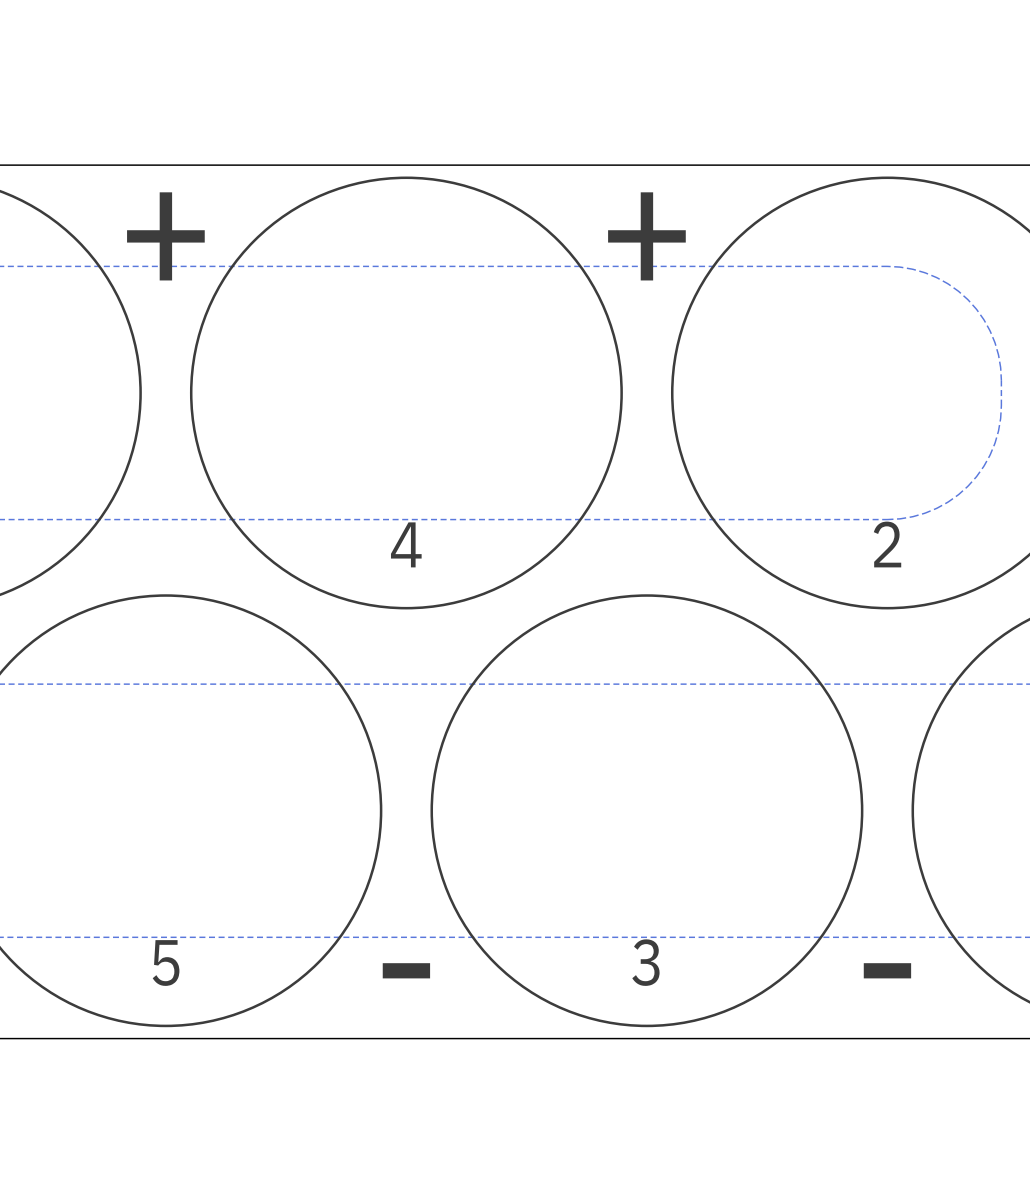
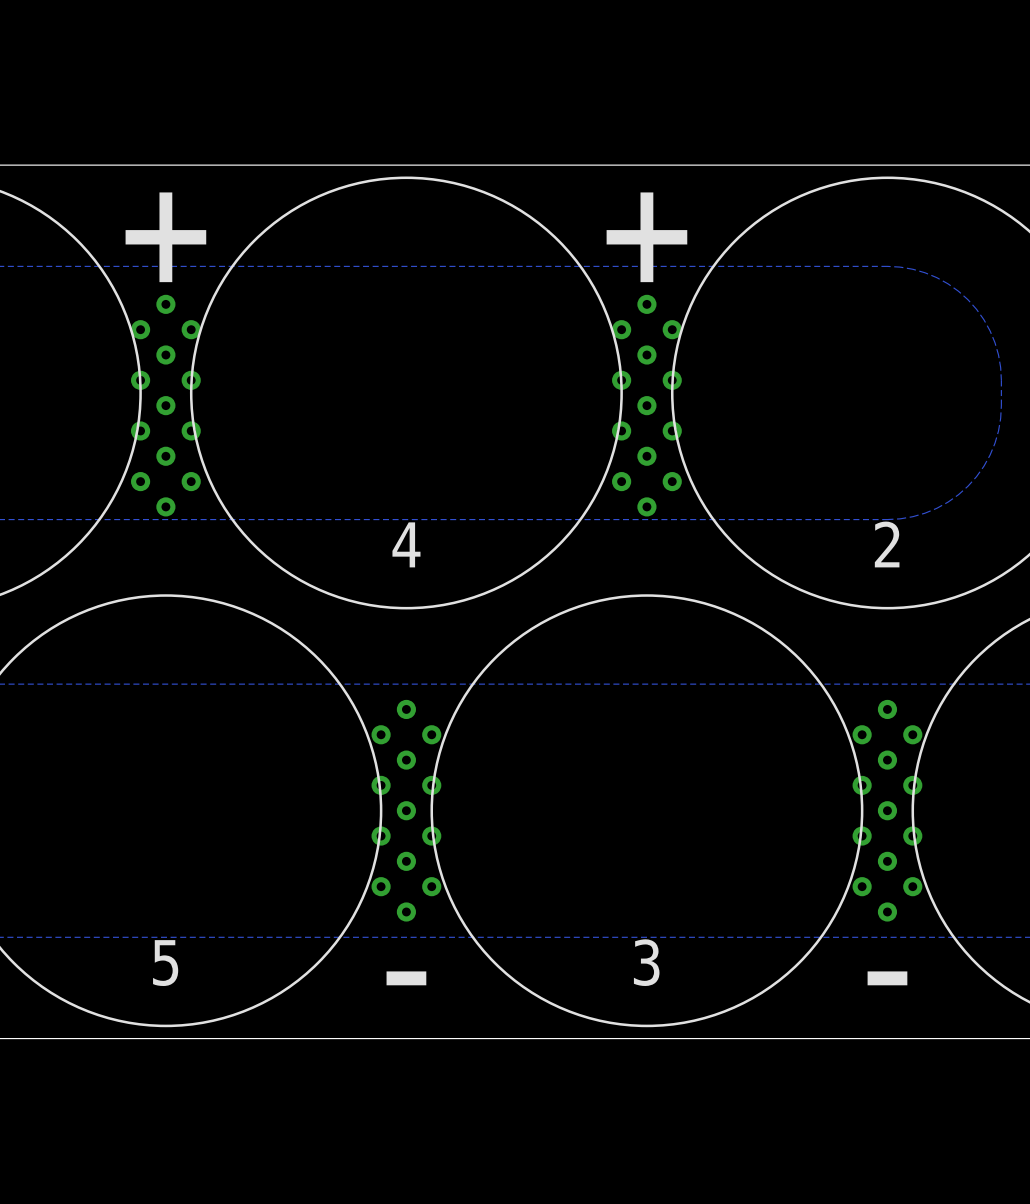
via: none -> (165, 304)
via: none -> (646, 304)
via: none -> (140, 329)
via: none -> (191, 329)
via: none -> (621, 329)
via: none -> (672, 329)
via: none -> (165, 355)
via: none -> (646, 355)
via: none -> (140, 380)
via: none -> (191, 380)
via: none -> (621, 380)
via: none -> (672, 380)
via: none -> (165, 405)
via: none -> (646, 405)
via: none -> (140, 430)
via: none -> (191, 430)
via: none -> (621, 430)
via: none -> (672, 430)
via: none -> (165, 456)
via: none -> (646, 456)
via: none -> (140, 481)
via: none -> (191, 481)
via: none -> (621, 481)
via: none -> (672, 481)
via: none -> (165, 506)
via: none -> (646, 506)
via: none -> (406, 709)
via: none -> (887, 709)
via: none -> (381, 734)
via: none -> (431, 734)
via: none -> (862, 734)
via: none -> (912, 734)
via: none -> (406, 760)
via: none -> (887, 760)
via: none -> (381, 785)
via: none -> (431, 785)
via: none -> (862, 785)
via: none -> (912, 785)
via: none -> (406, 810)
via: none -> (887, 810)
via: none -> (381, 836)
via: none -> (431, 836)
via: none -> (862, 836)
via: none -> (912, 836)
via: none -> (406, 861)
via: none -> (887, 861)
via: none -> (381, 886)
via: none -> (431, 886)
via: none -> (862, 886)
via: none -> (912, 886)
via: none -> (406, 911)
via: none -> (887, 911)

